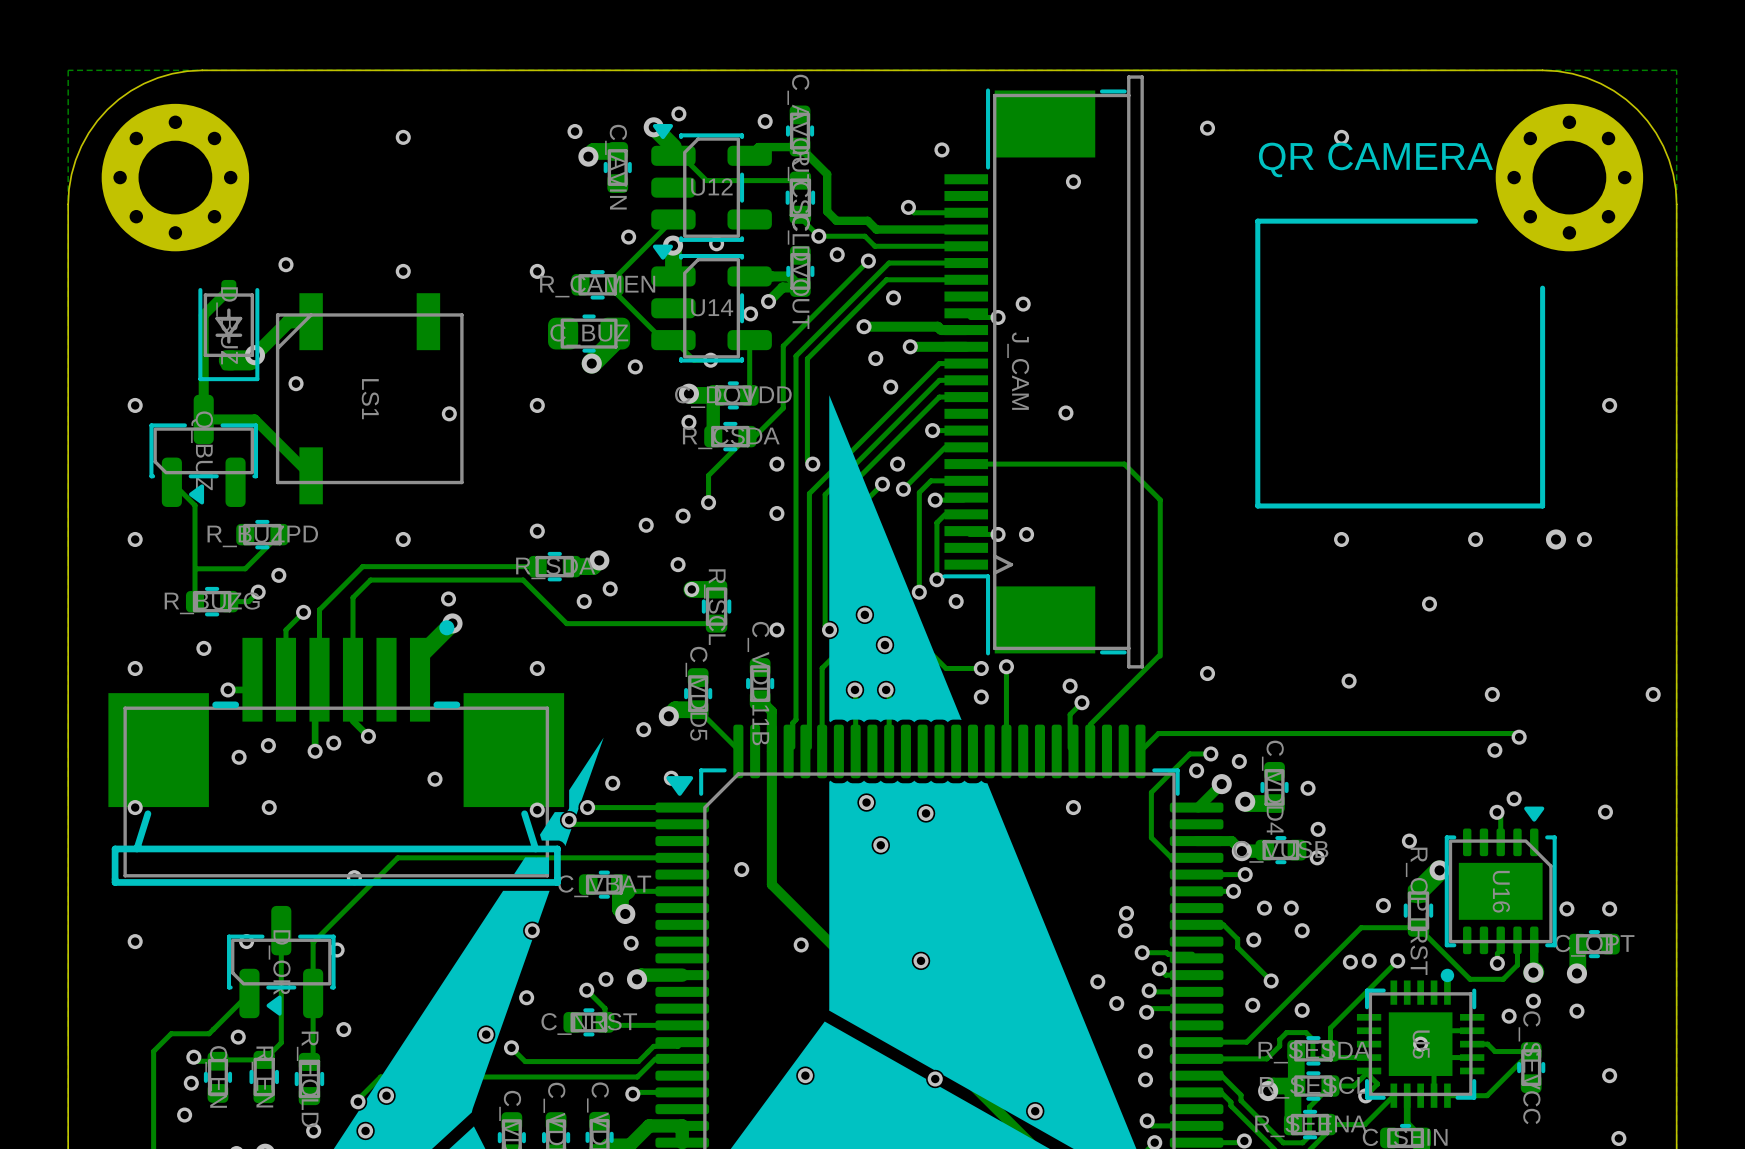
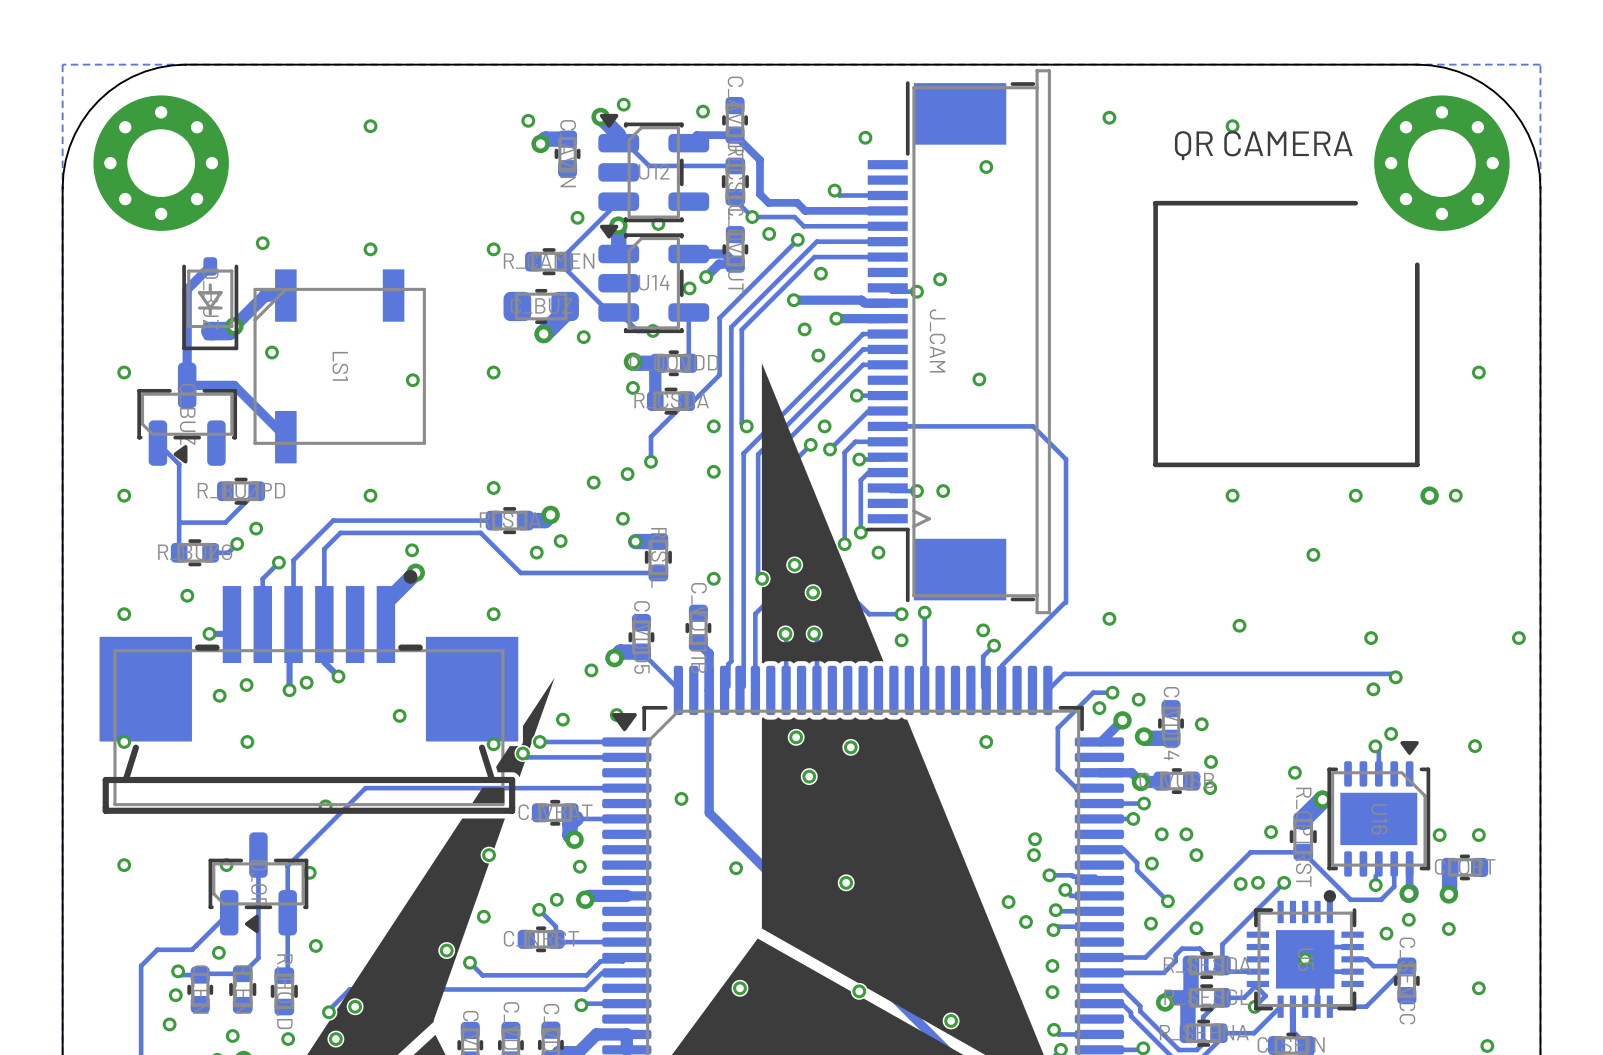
via: none -> (232, 1035)

